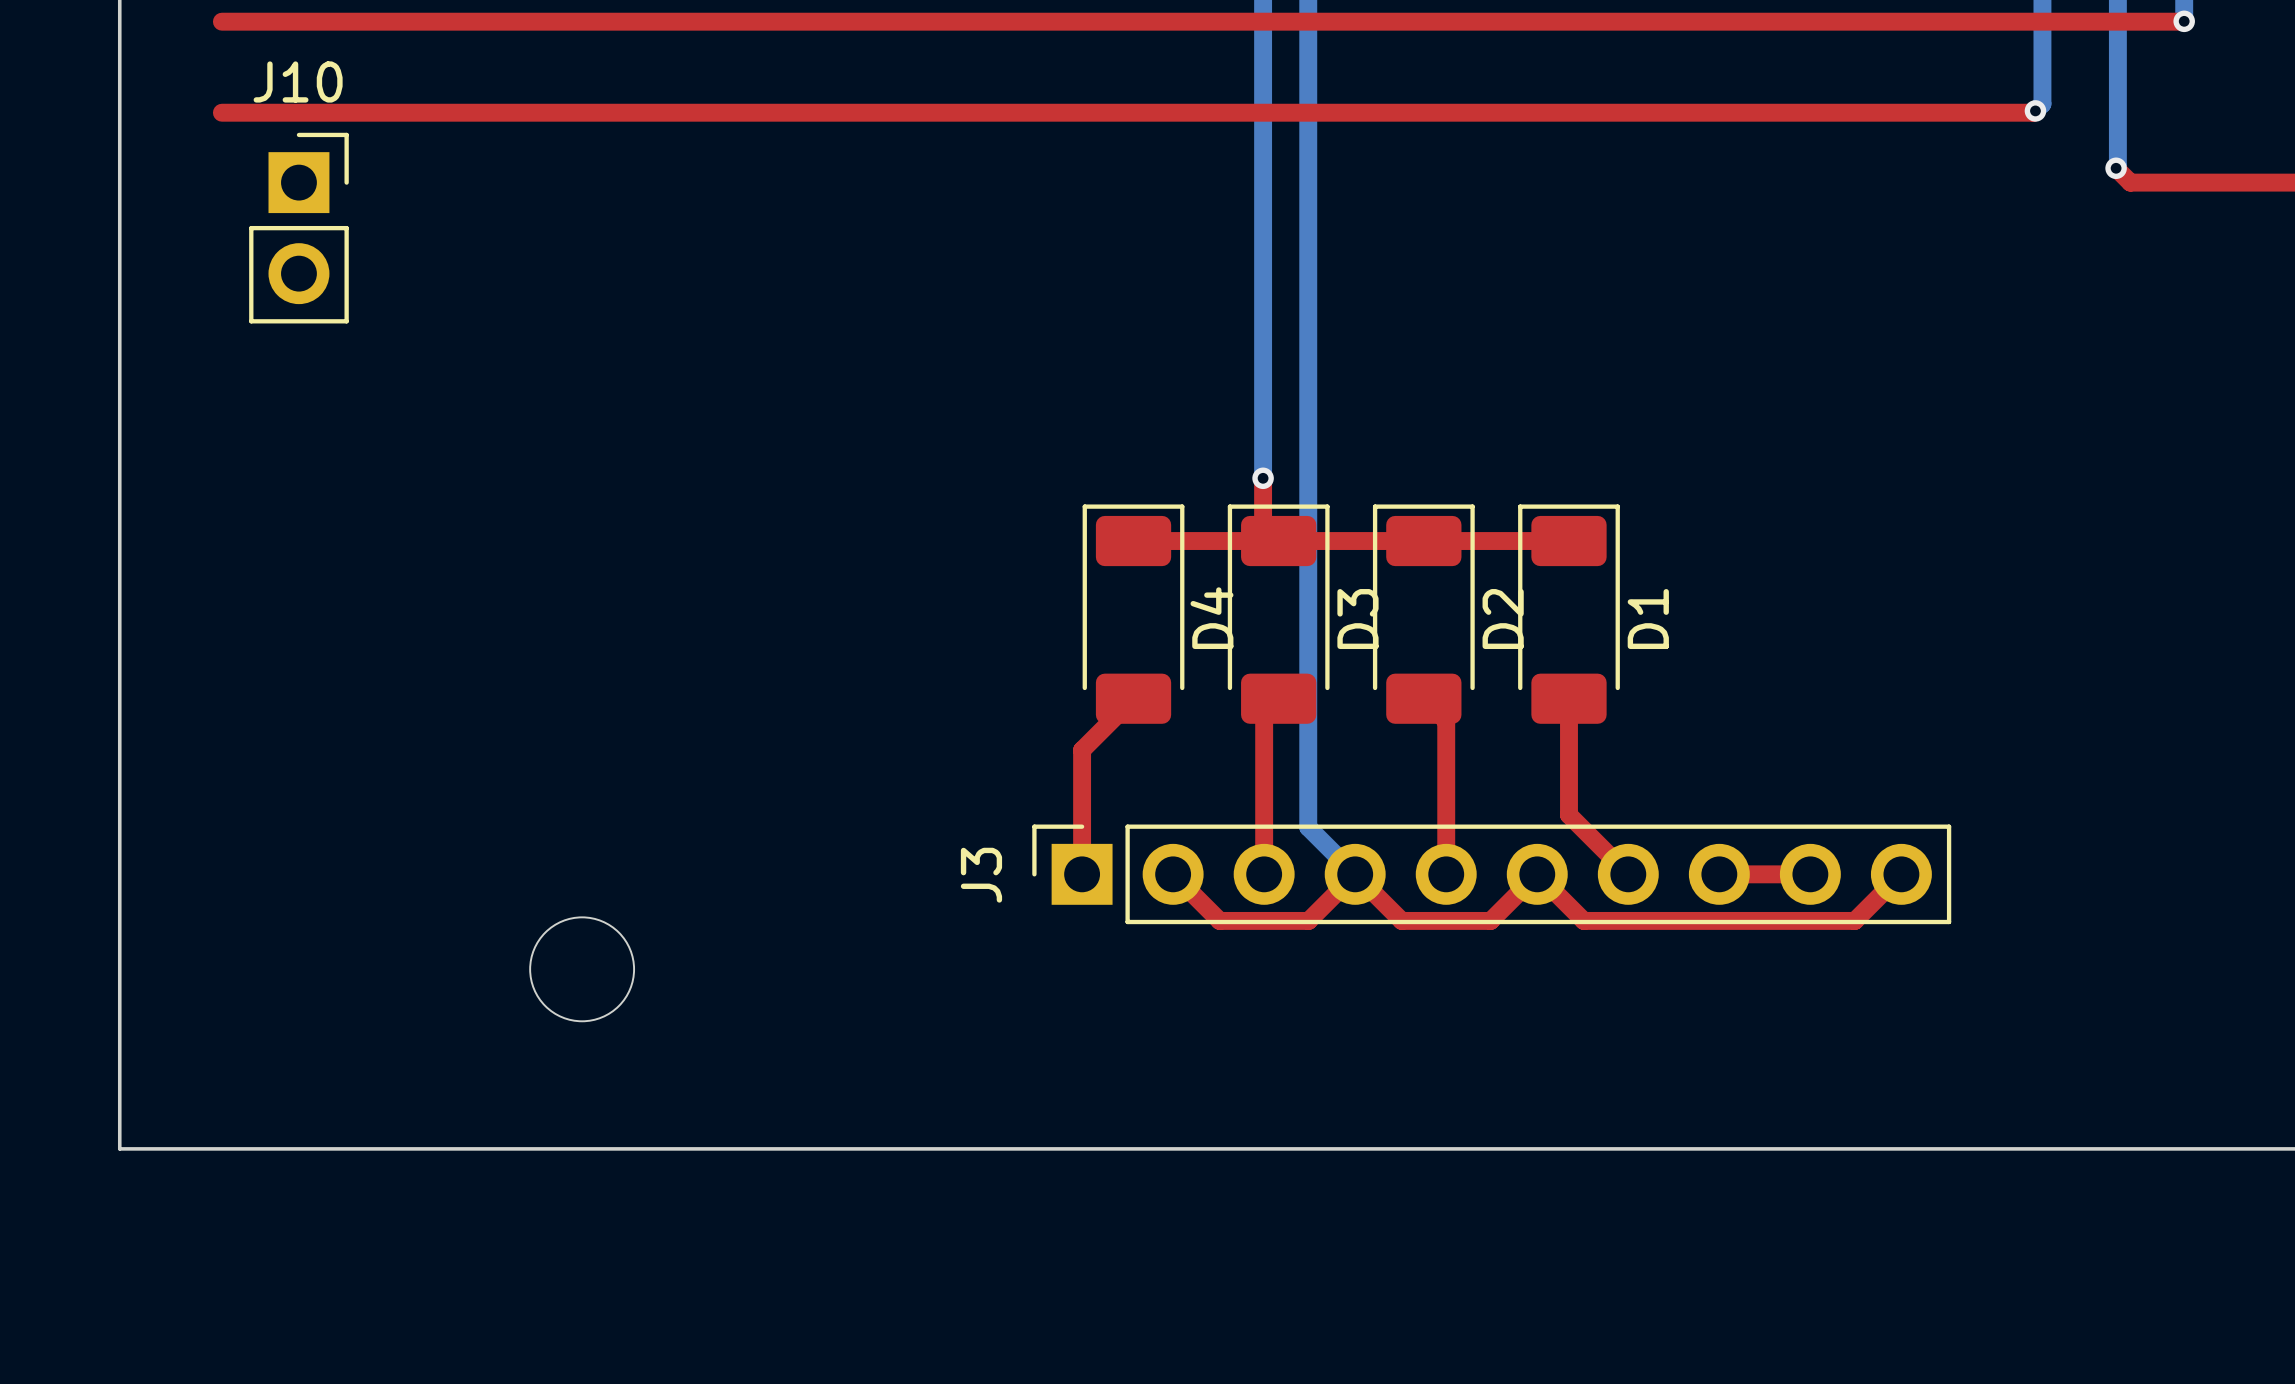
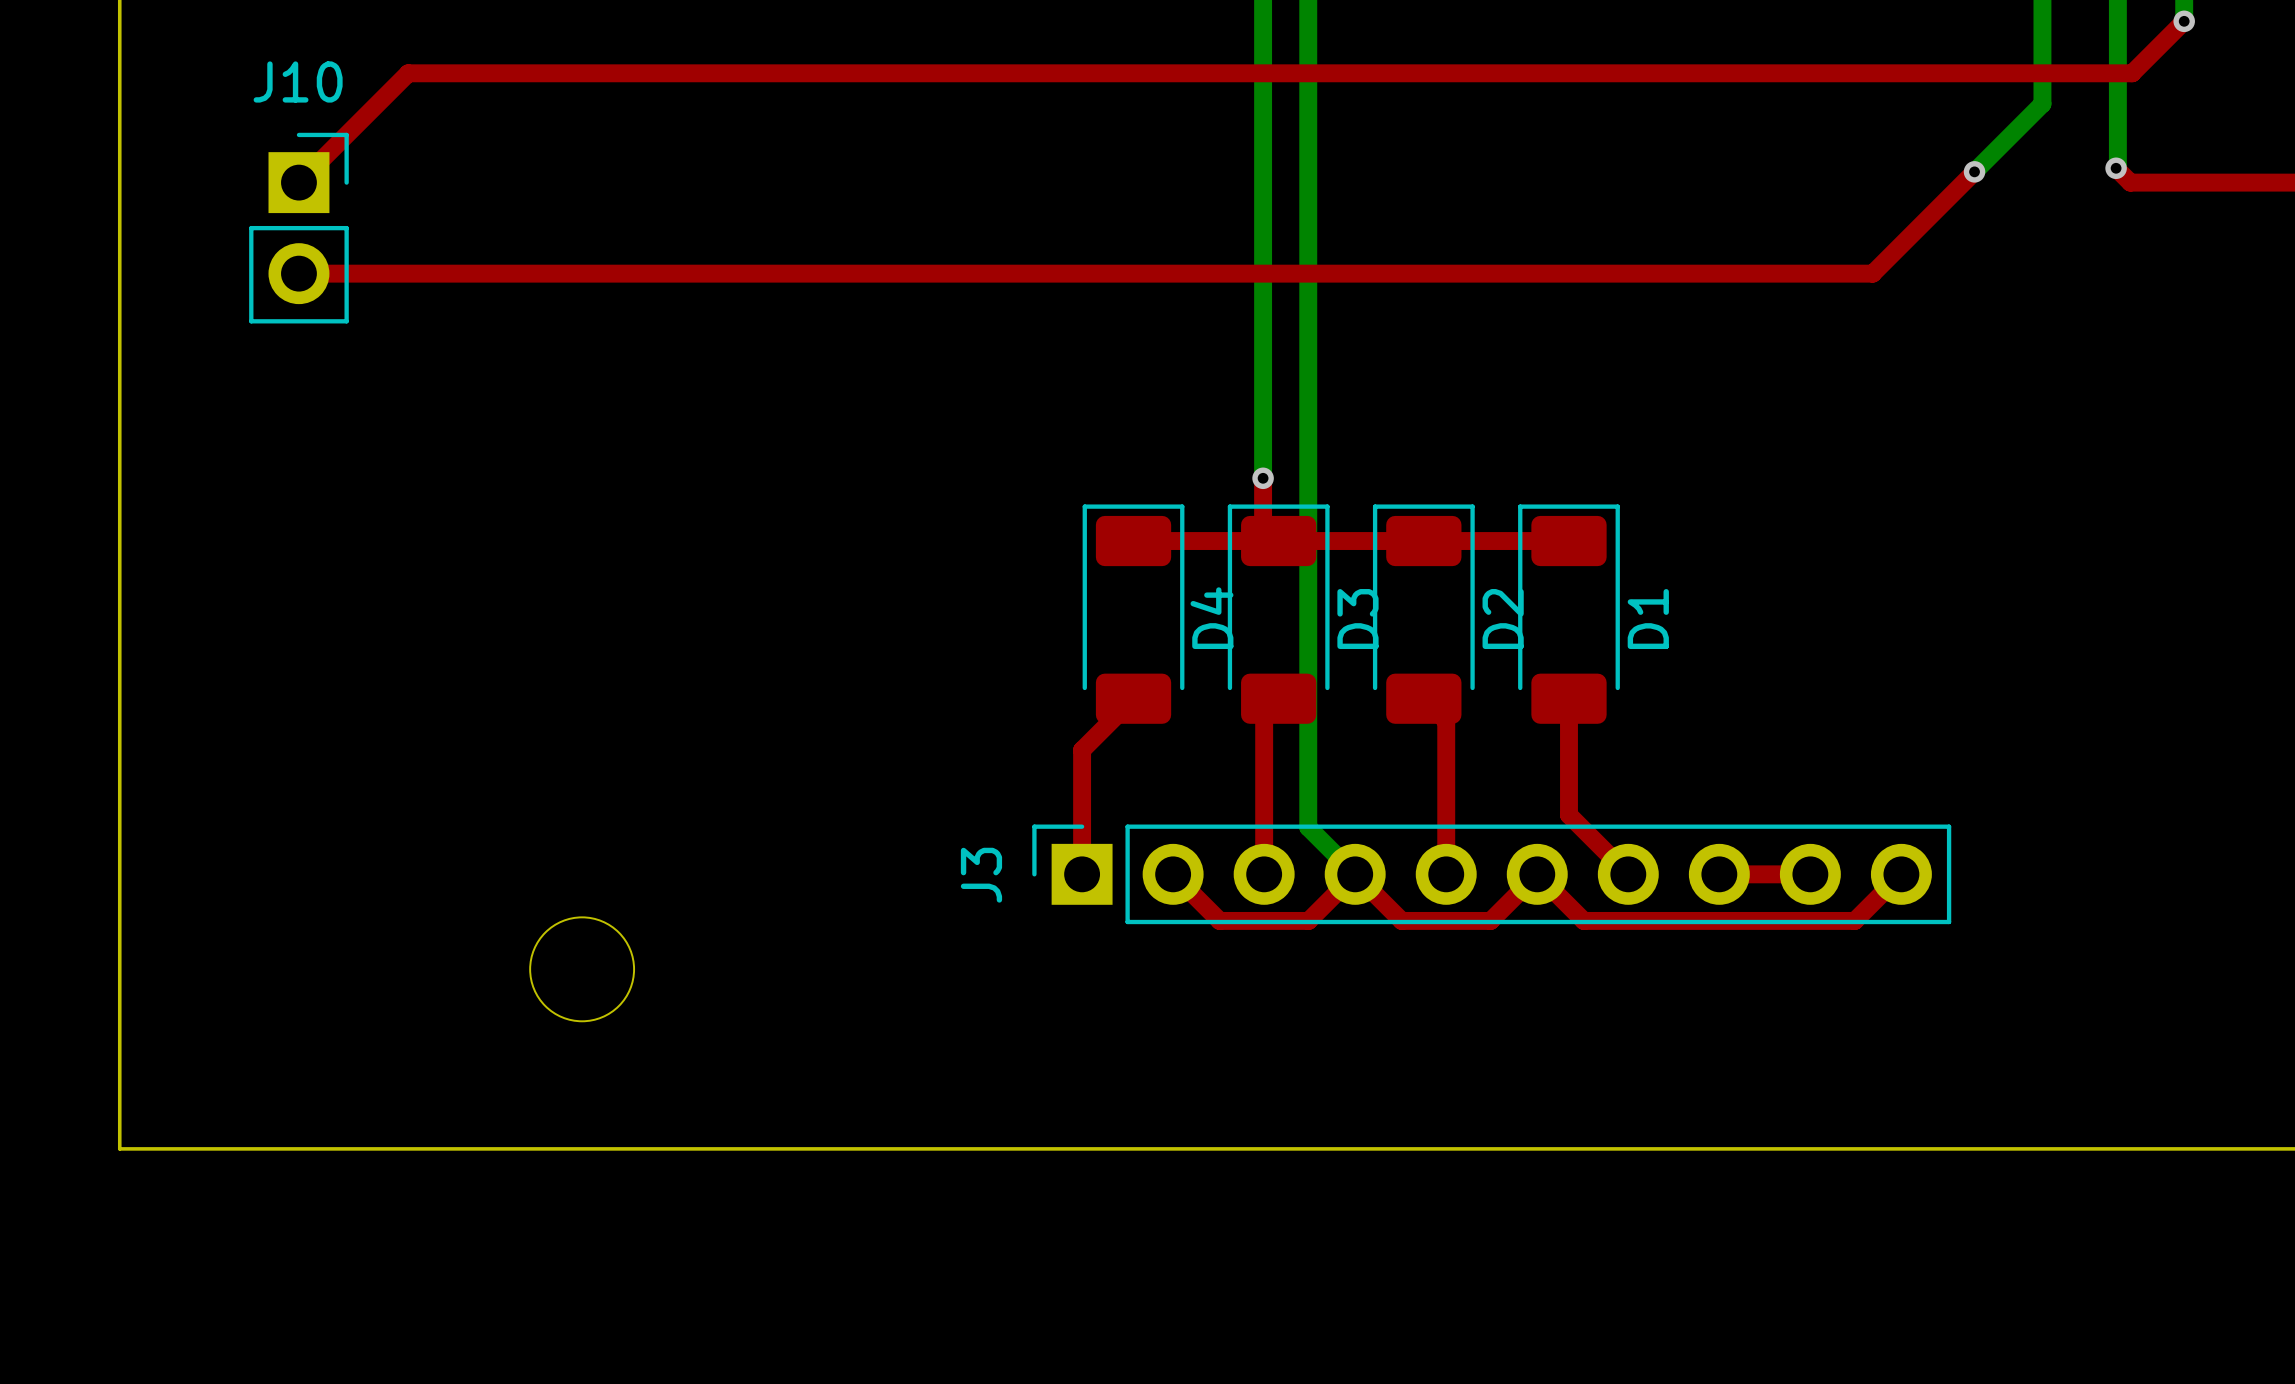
top track: (221, 21) (2183, 21) -> (298, 182) (408, 73) (2132, 73) (2183, 21)
top track: (2035, 110) (2033, 112) (221, 112) -> none
bottom track: none -> (2035, 110) (1974, 171)
via position: (2035, 110) -> (1974, 171)
top track: none -> (1974, 171) (1872, 273) (298, 273)

